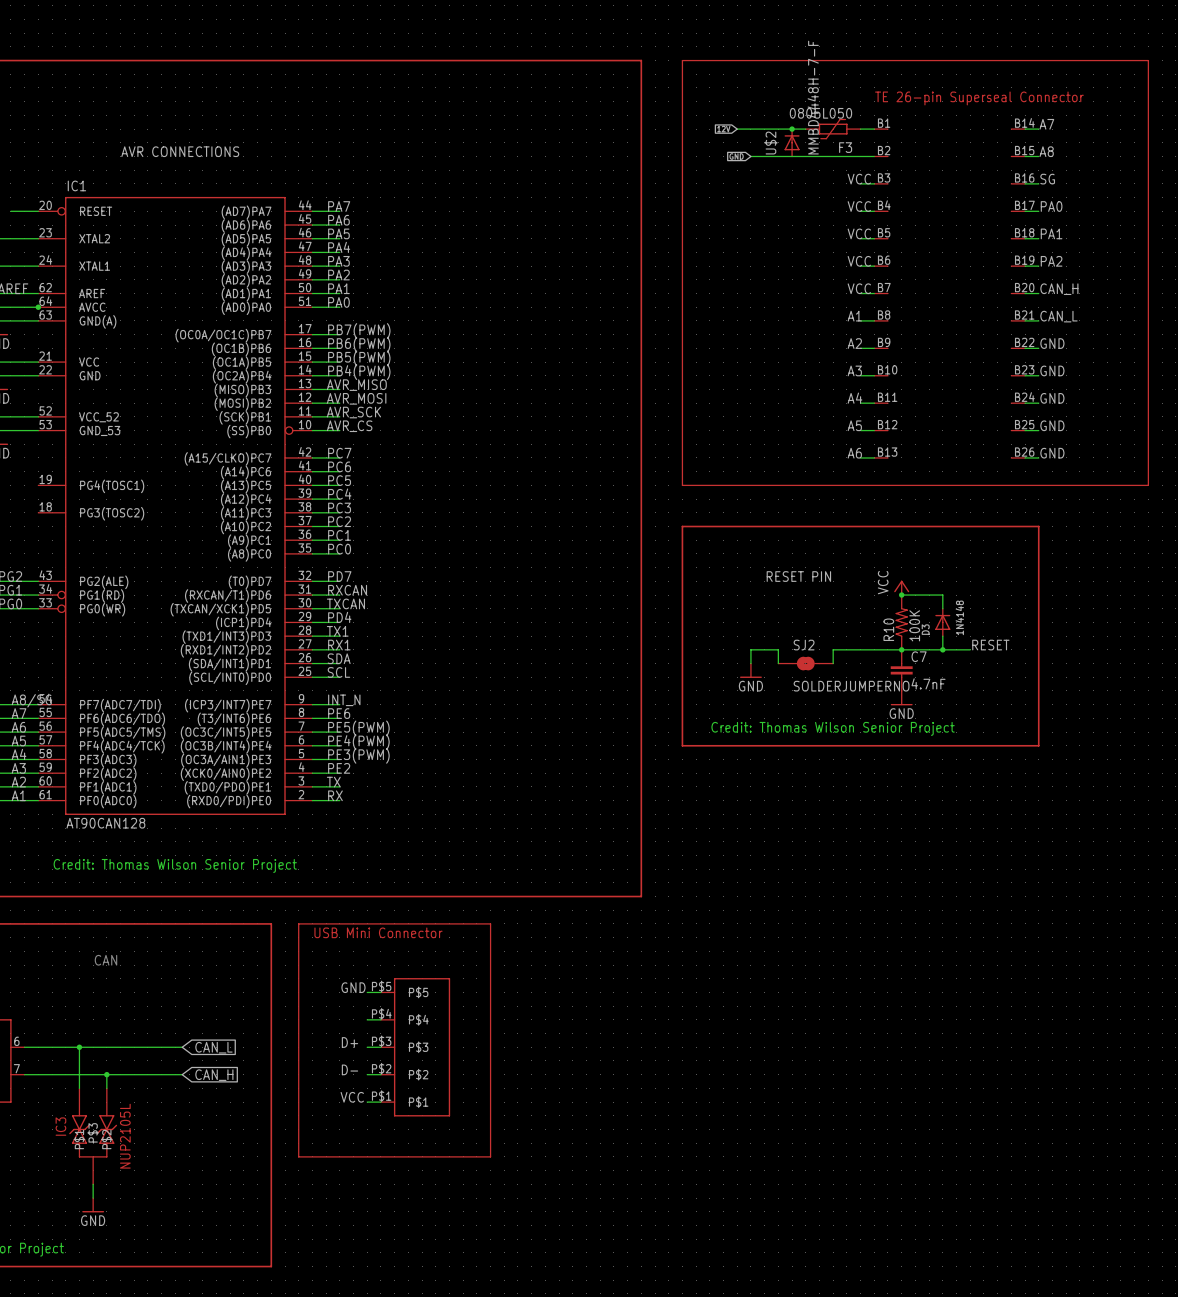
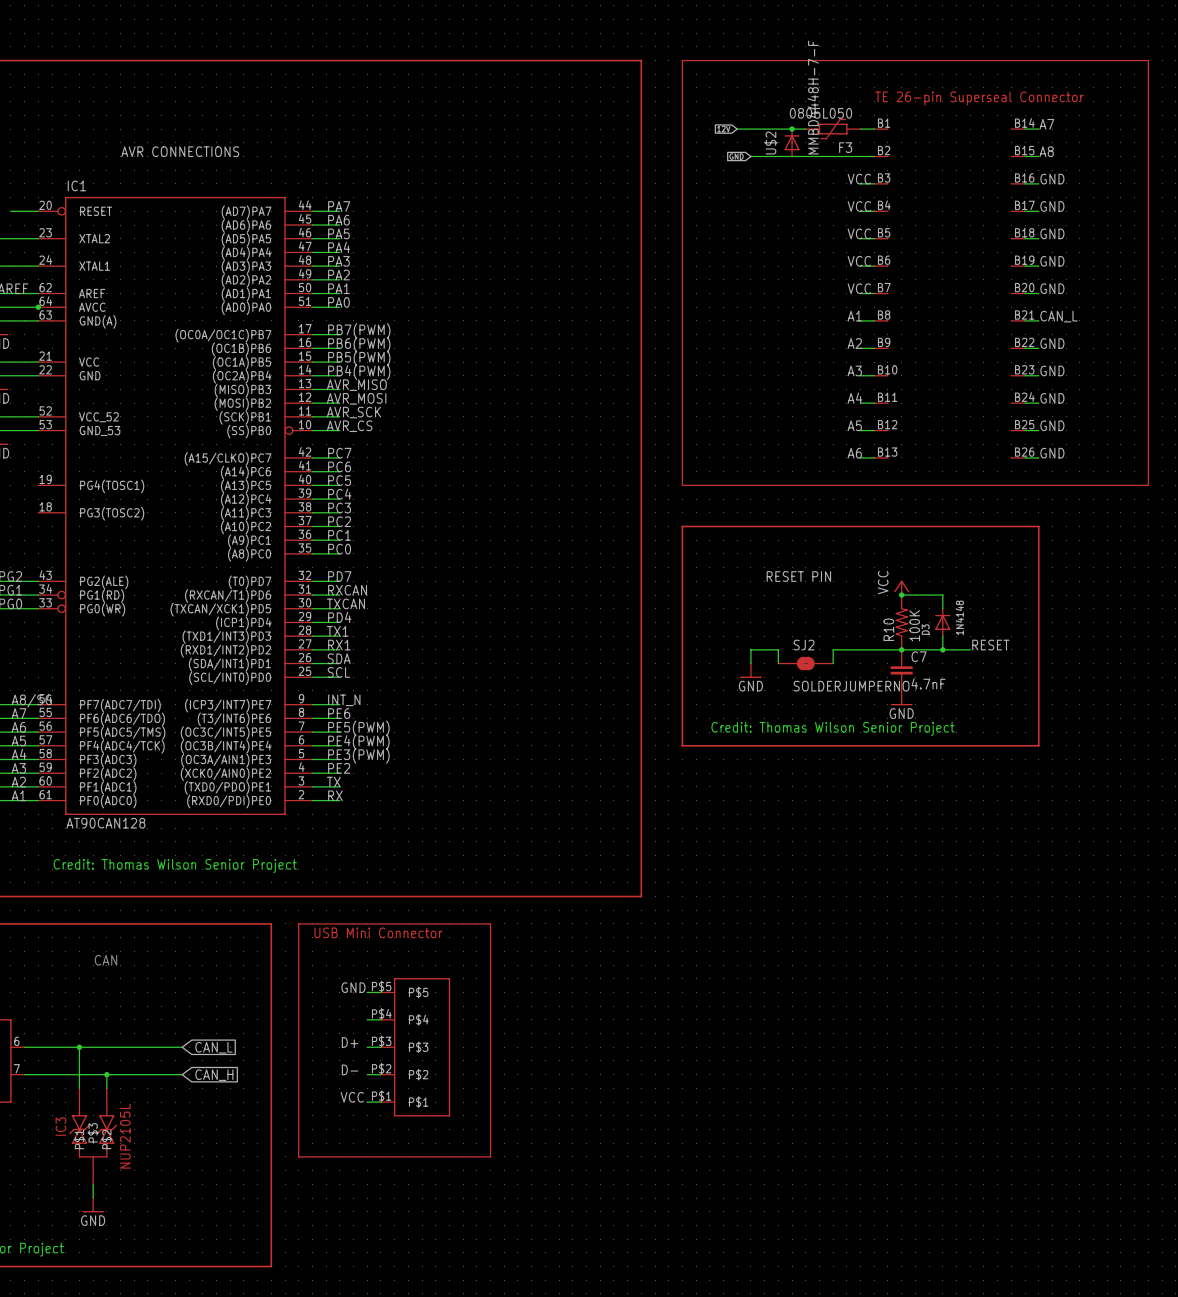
label: SG (1047, 179) -> GND (1052, 179)
label: PA0 (1051, 206) -> GND (1052, 206)
label: PA1 (1051, 233) -> GND (1052, 233)
label: PA2 (1051, 261) -> GND (1052, 261)
label: CAN_H (1059, 289) -> GND (1052, 288)

